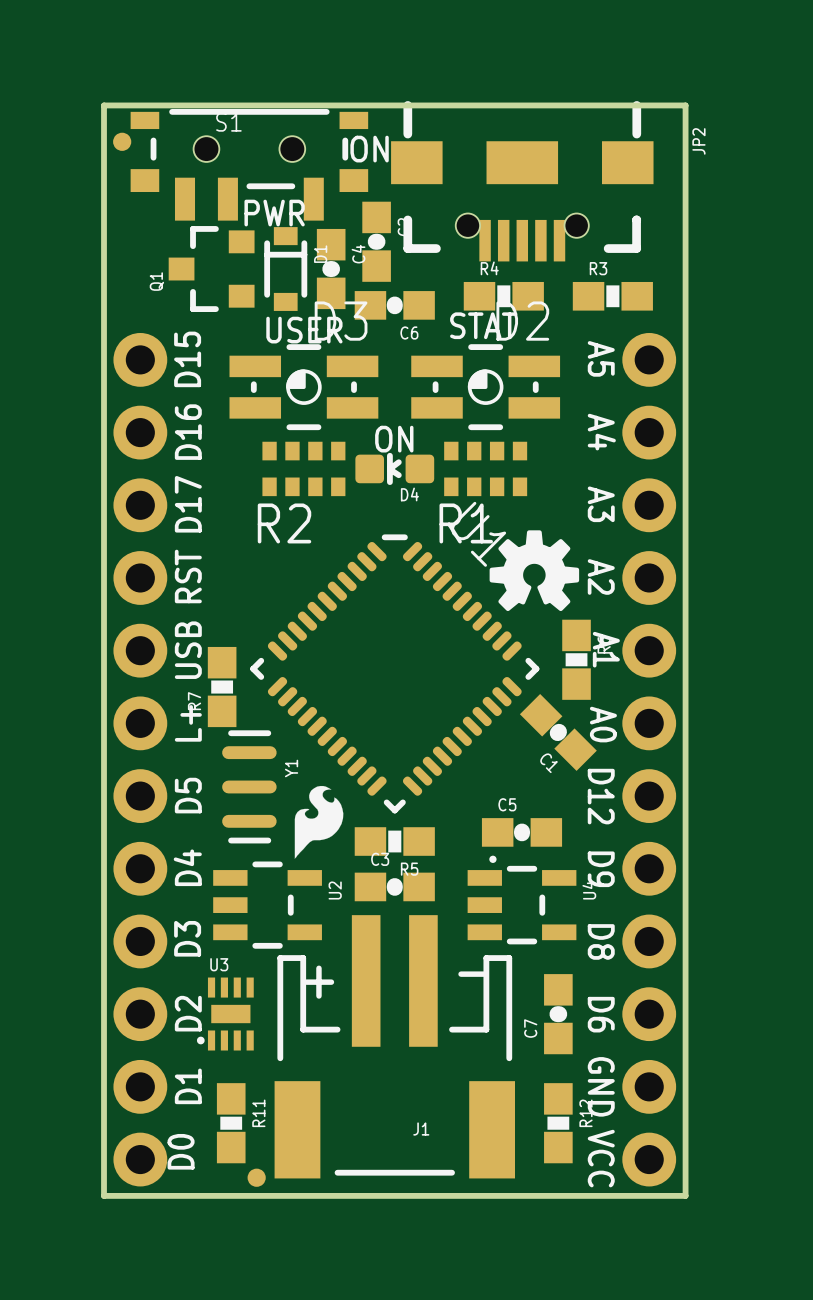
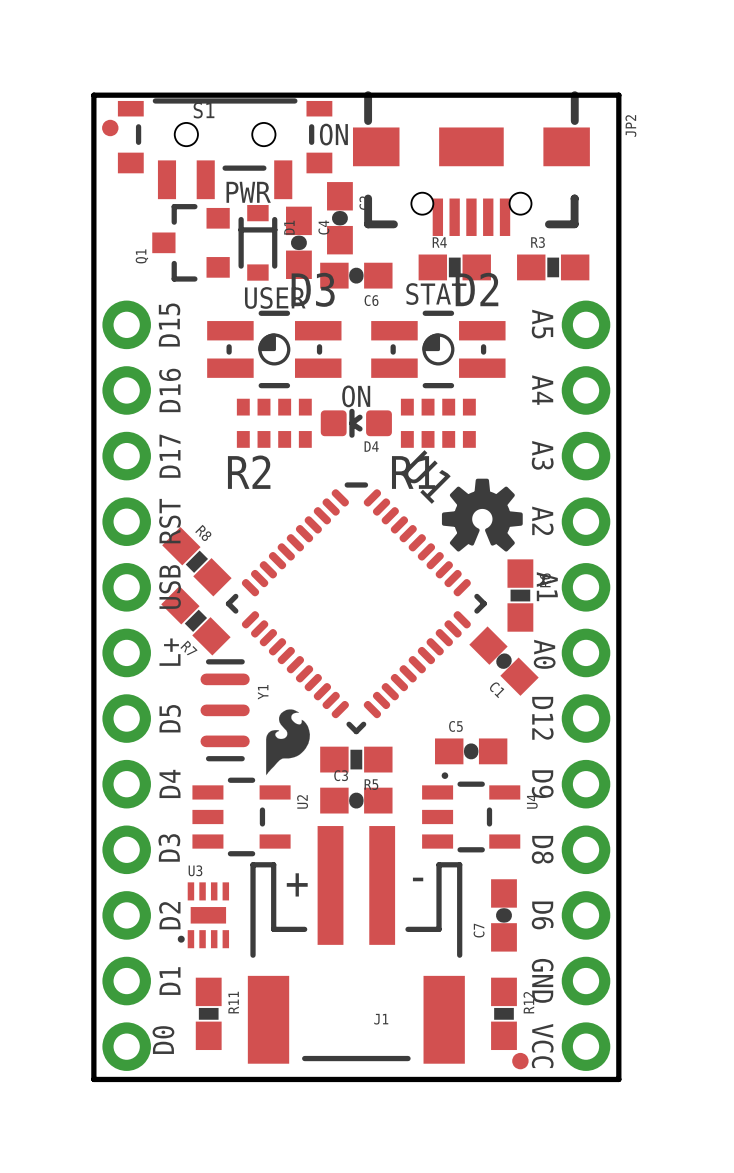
R8: none -> (196, 561)
R7 rotation: 0° (222, 687) -> 45° counterclockwise (195, 620)
part position: (256, 1177) -> (520, 1061)

